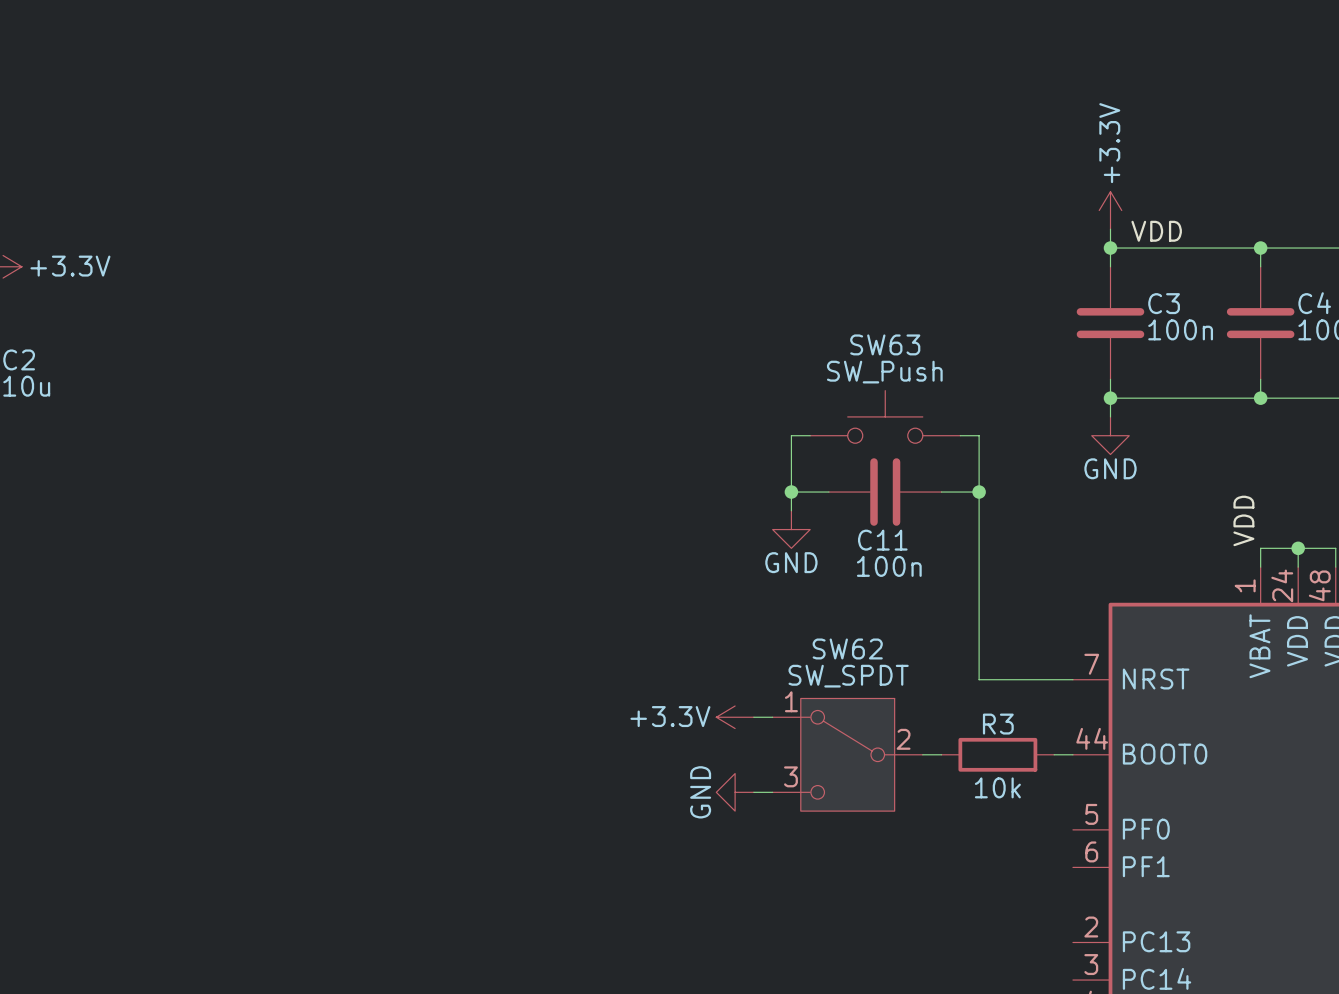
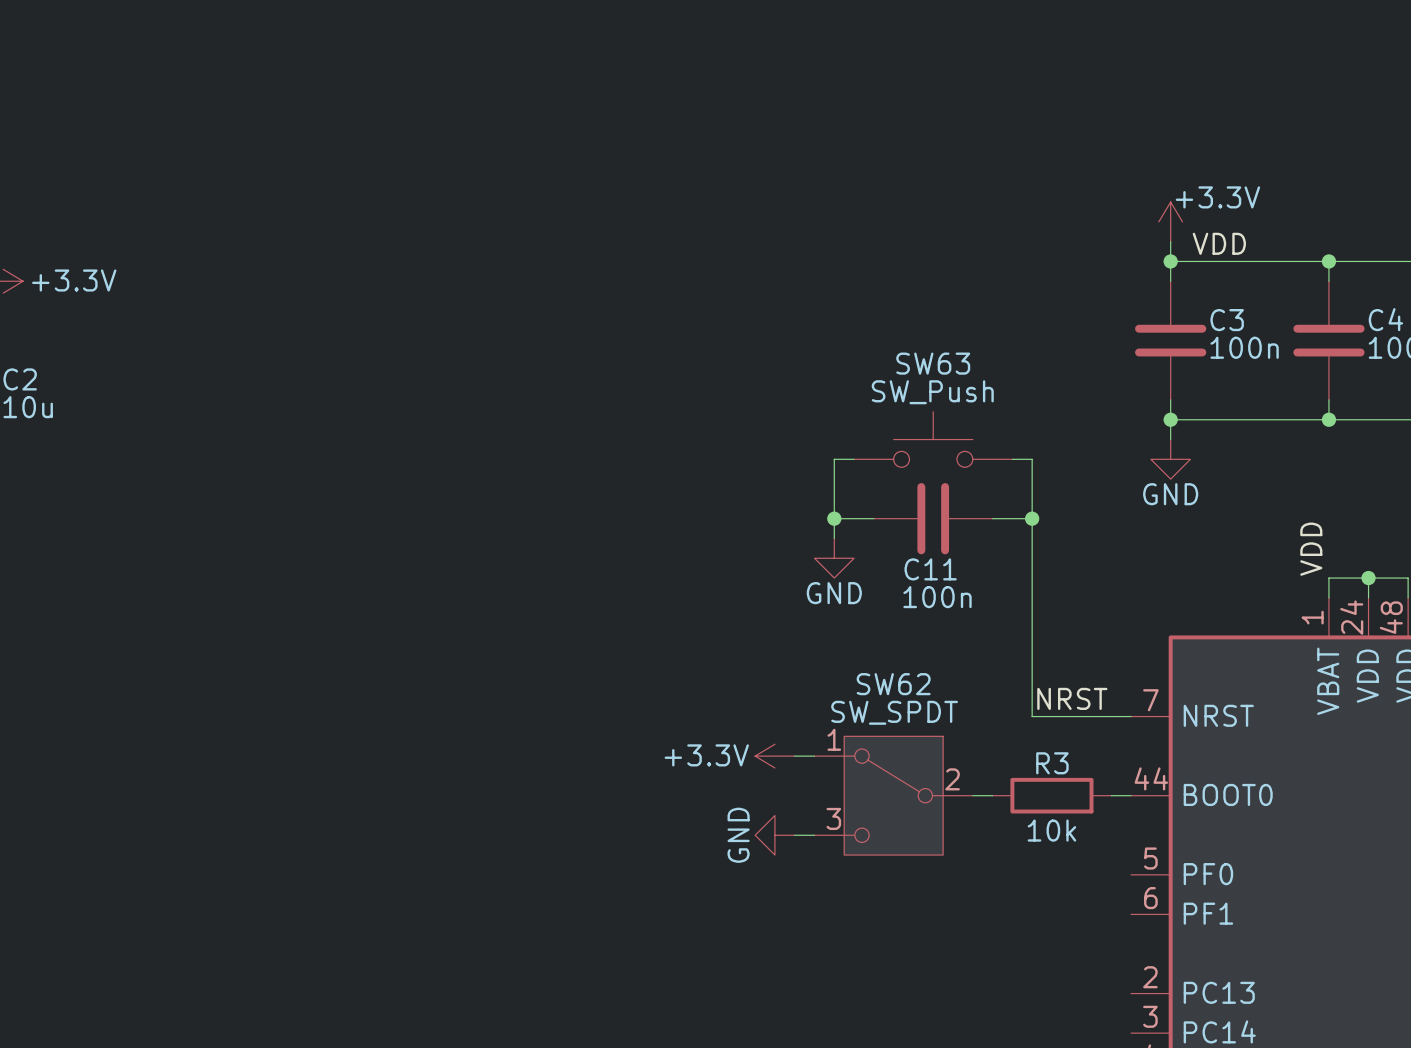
power symbol text rotation: 0° (1109, 143) -> 90° clockwise (1217, 197)
label: none -> NRST (1072, 698)

